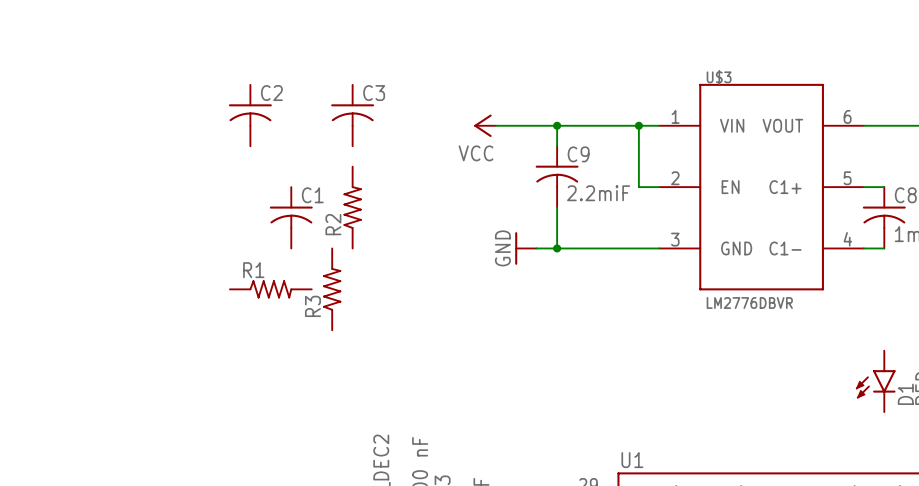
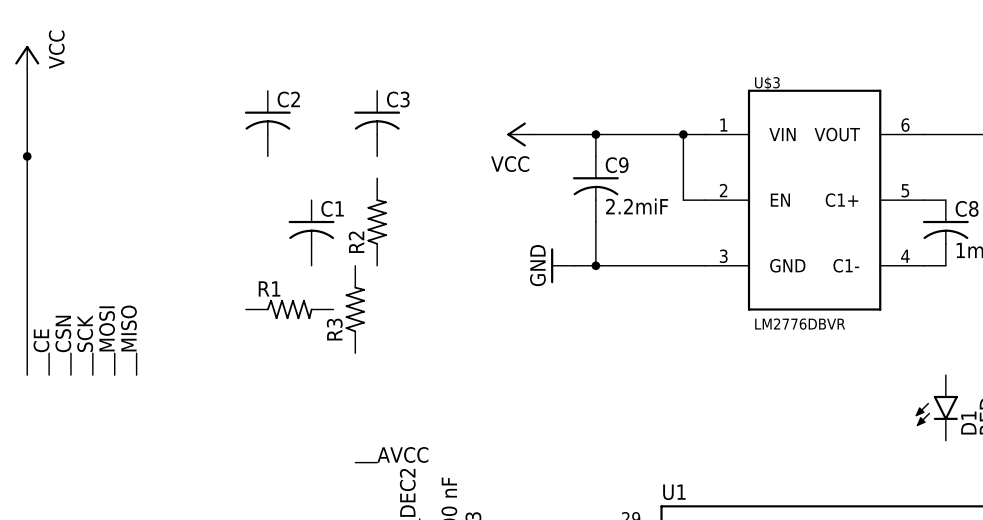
power symbol: none -> VCC (27, 57)
wire: none -> (27, 68) (27, 375)
junction: none -> (27, 156)
label: none -> MISO (128, 328)
label: none -> MOSI (107, 328)
label: none -> CSN (63, 333)
label: none -> SCK (85, 333)
label: none -> CE (41, 340)
wire: none -> (49, 353) (49, 375)
wire: none -> (70, 353) (70, 375)
wire: none -> (92, 353) (92, 375)
wire: none -> (114, 353) (114, 375)
wire: none -> (136, 353) (136, 375)
label: none -> AVCC (402, 454)
wire: none -> (355, 462) (377, 462)

